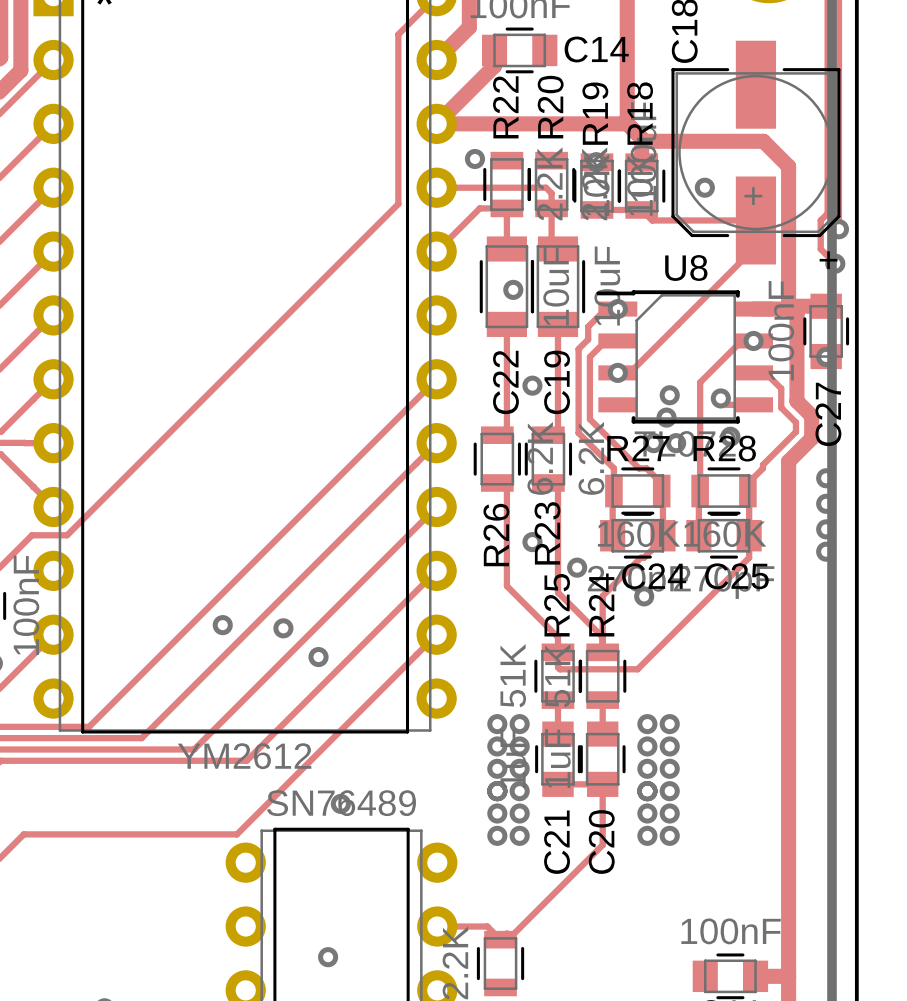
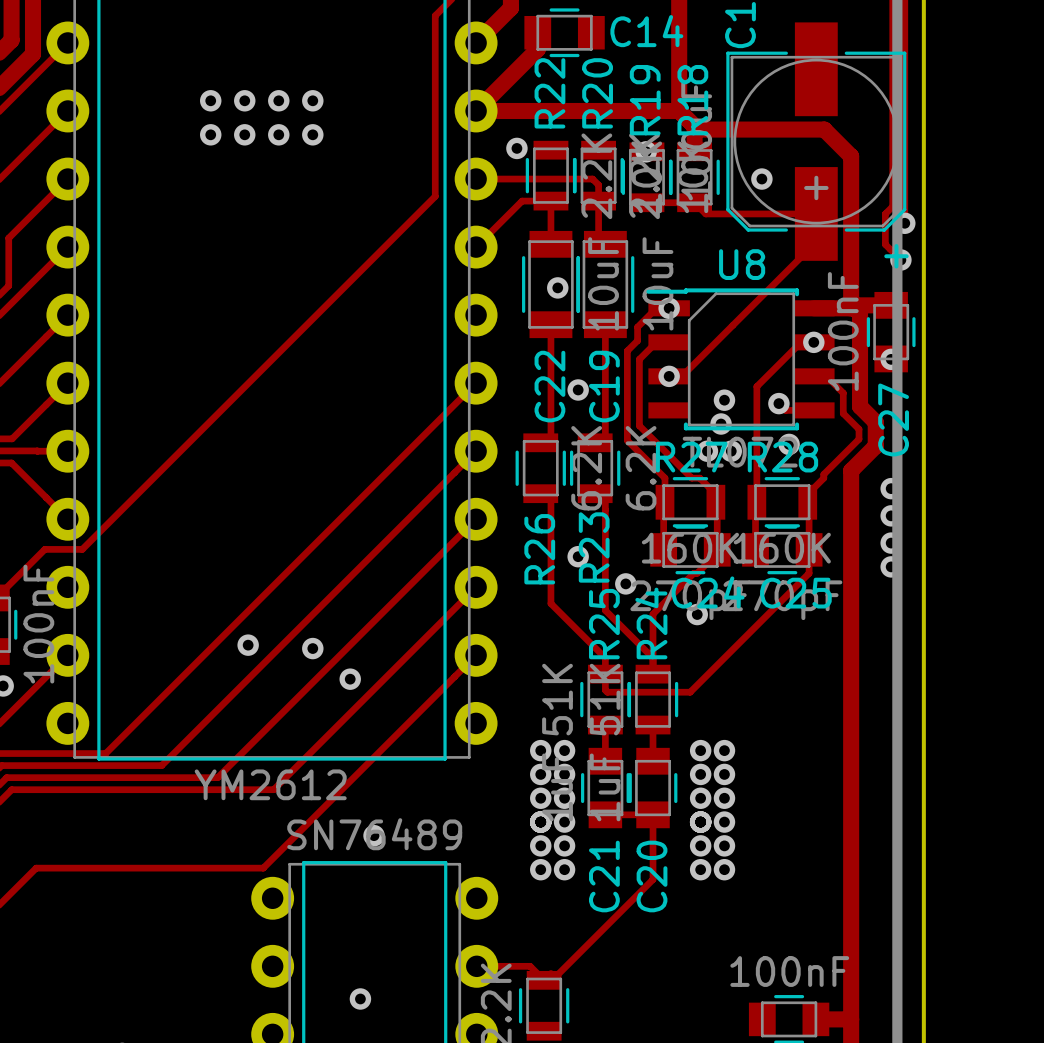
via: none -> (210, 100)
via: none -> (244, 100)
via: none -> (278, 100)
via: none -> (312, 100)
via: none -> (210, 134)
via: none -> (244, 134)
via: none -> (278, 134)
via: none -> (312, 134)

